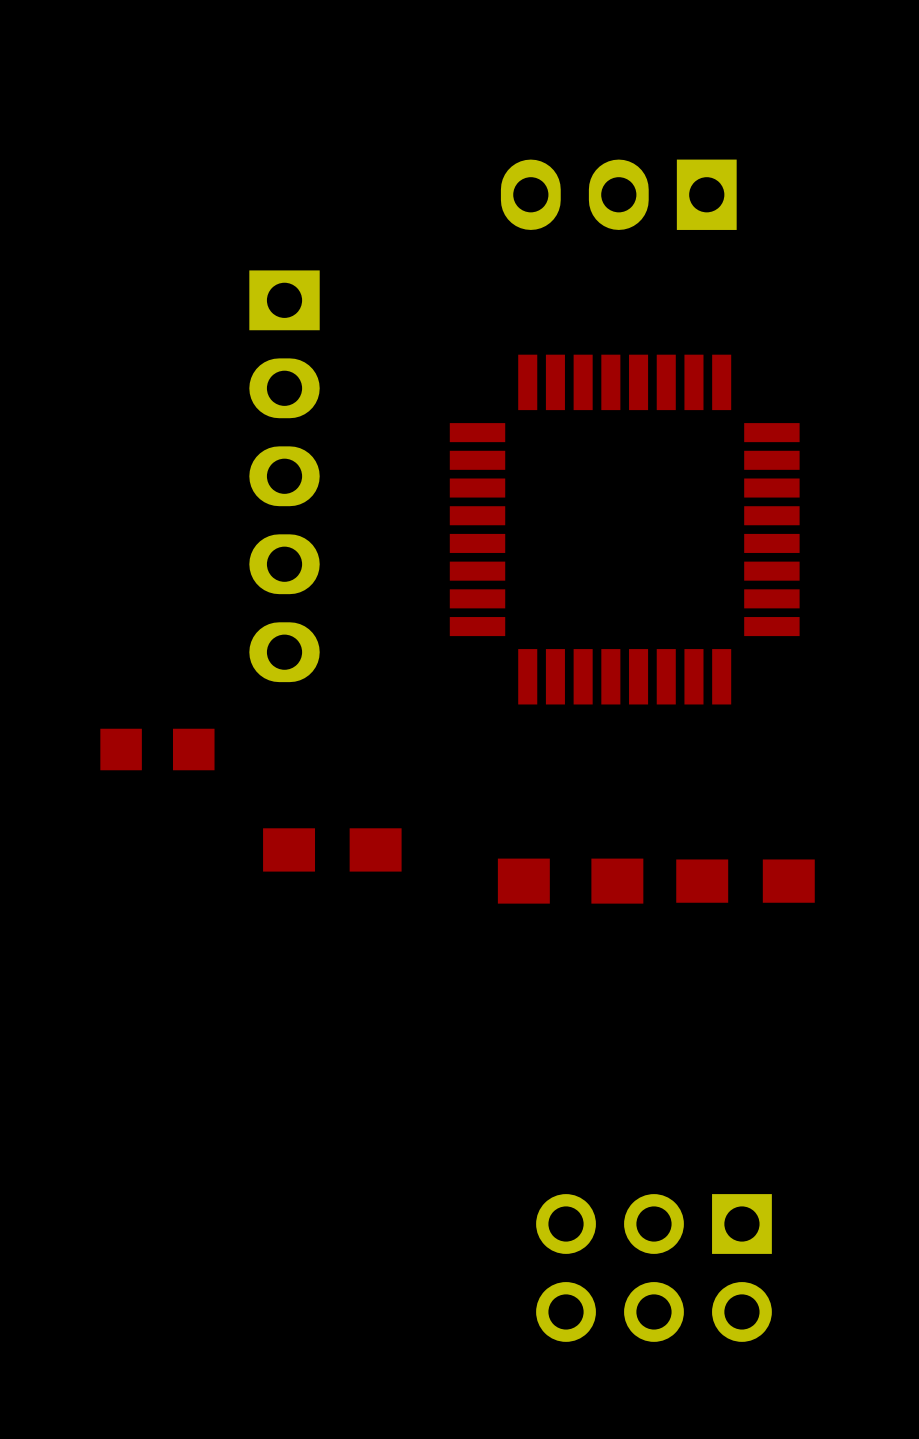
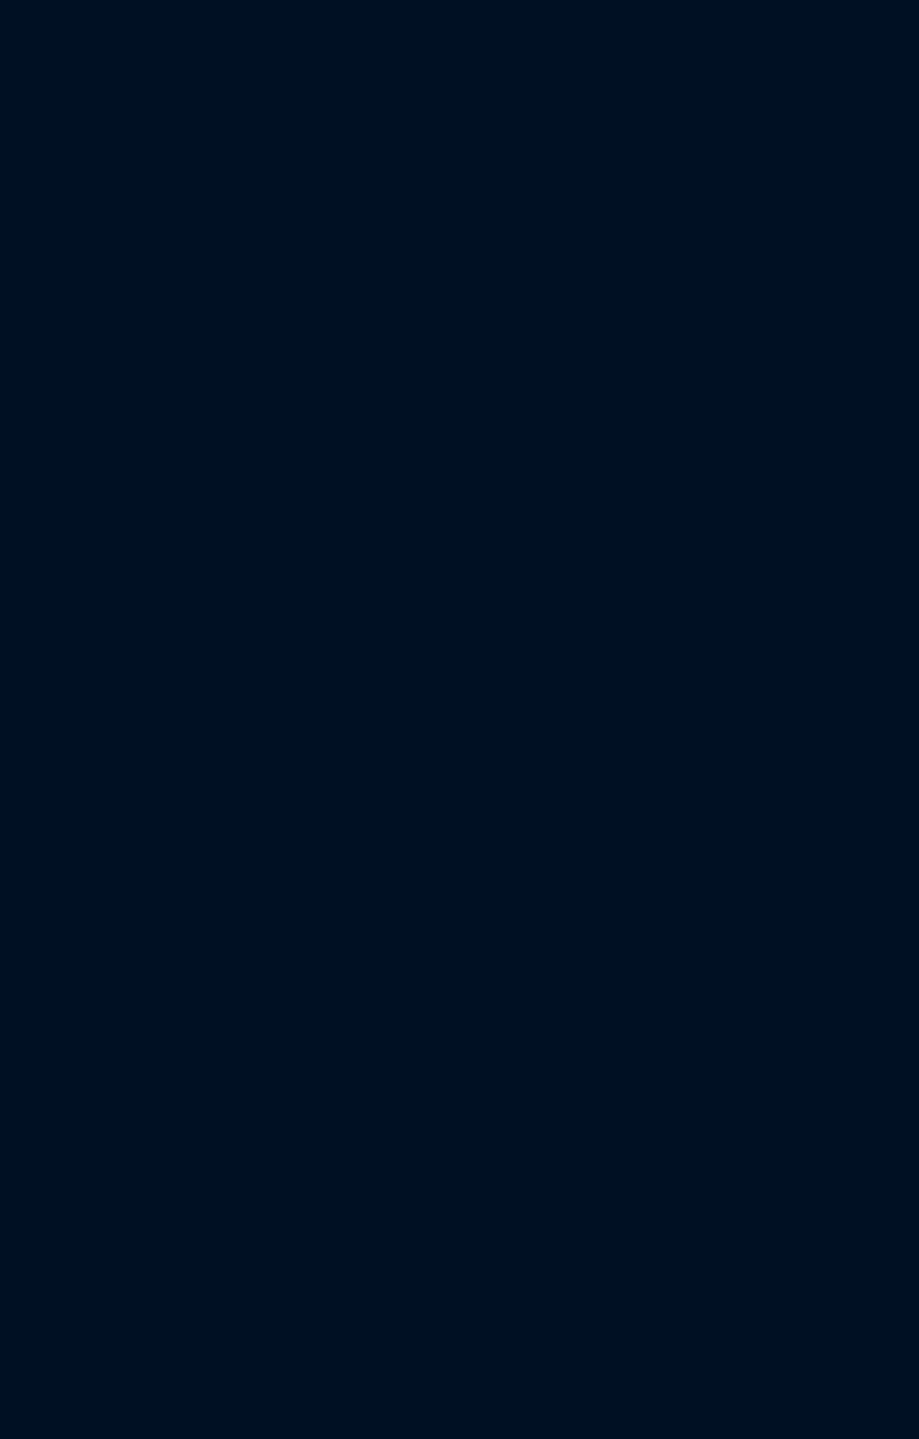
part: (618, 194) -> none
part: (284, 476) -> none
part: (624, 529) -> none
part: (157, 749) -> none
part: (332, 849) -> none
part: (570, 881) -> none
part: (745, 881) -> none
part: (653, 1267) -> none

